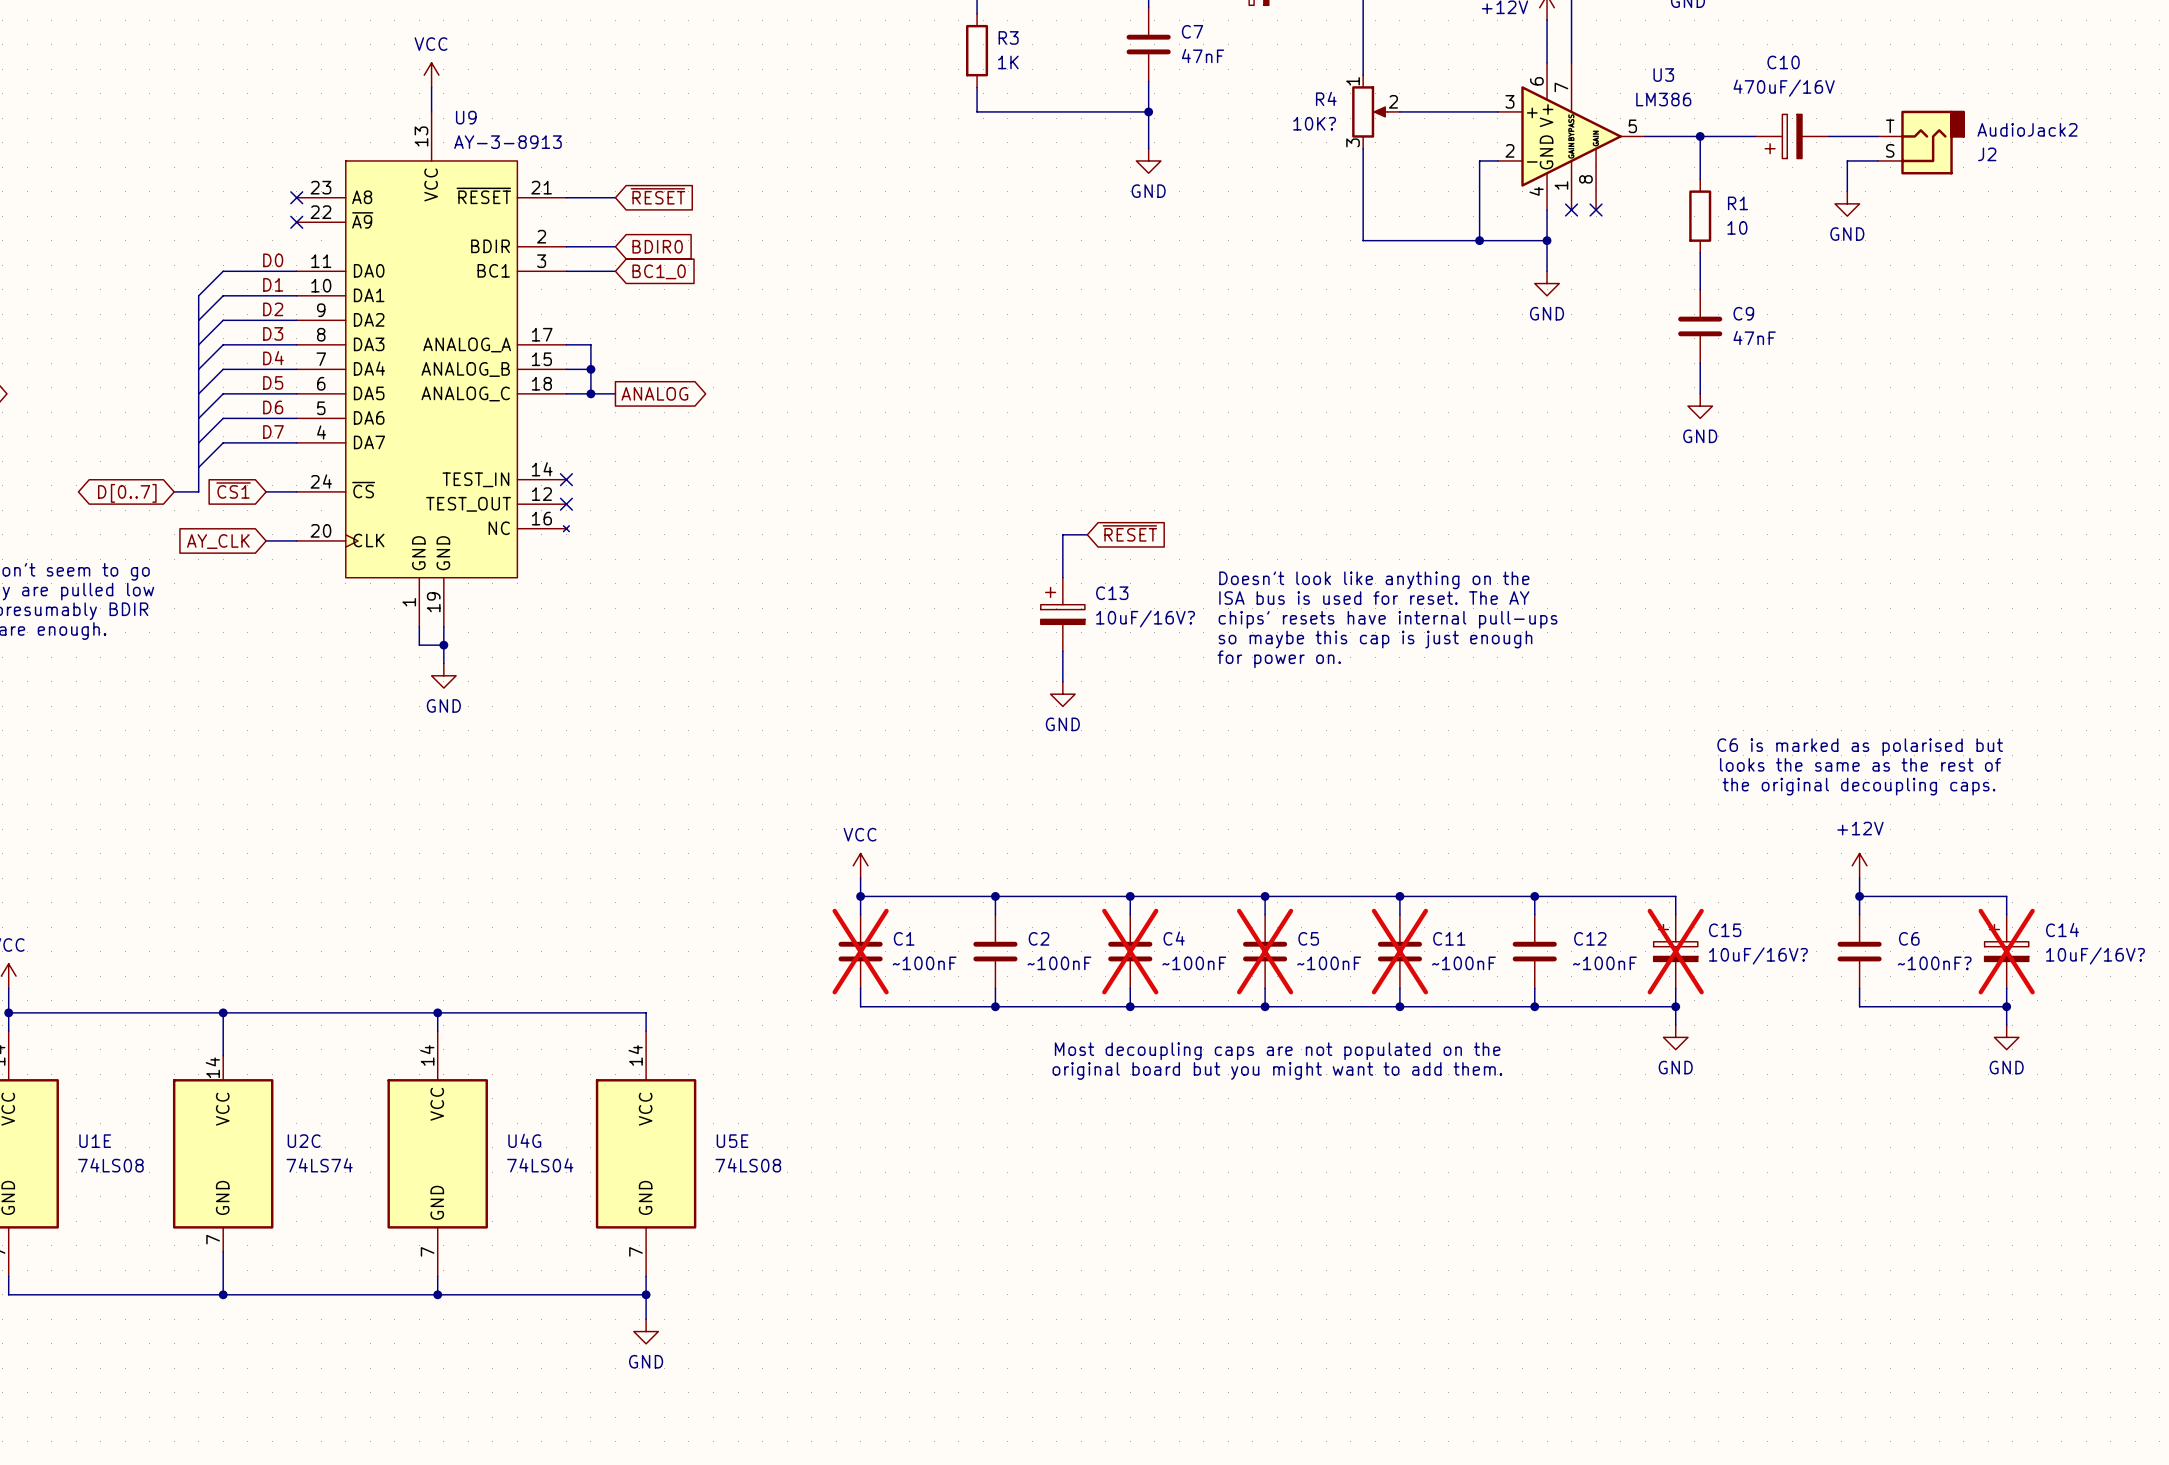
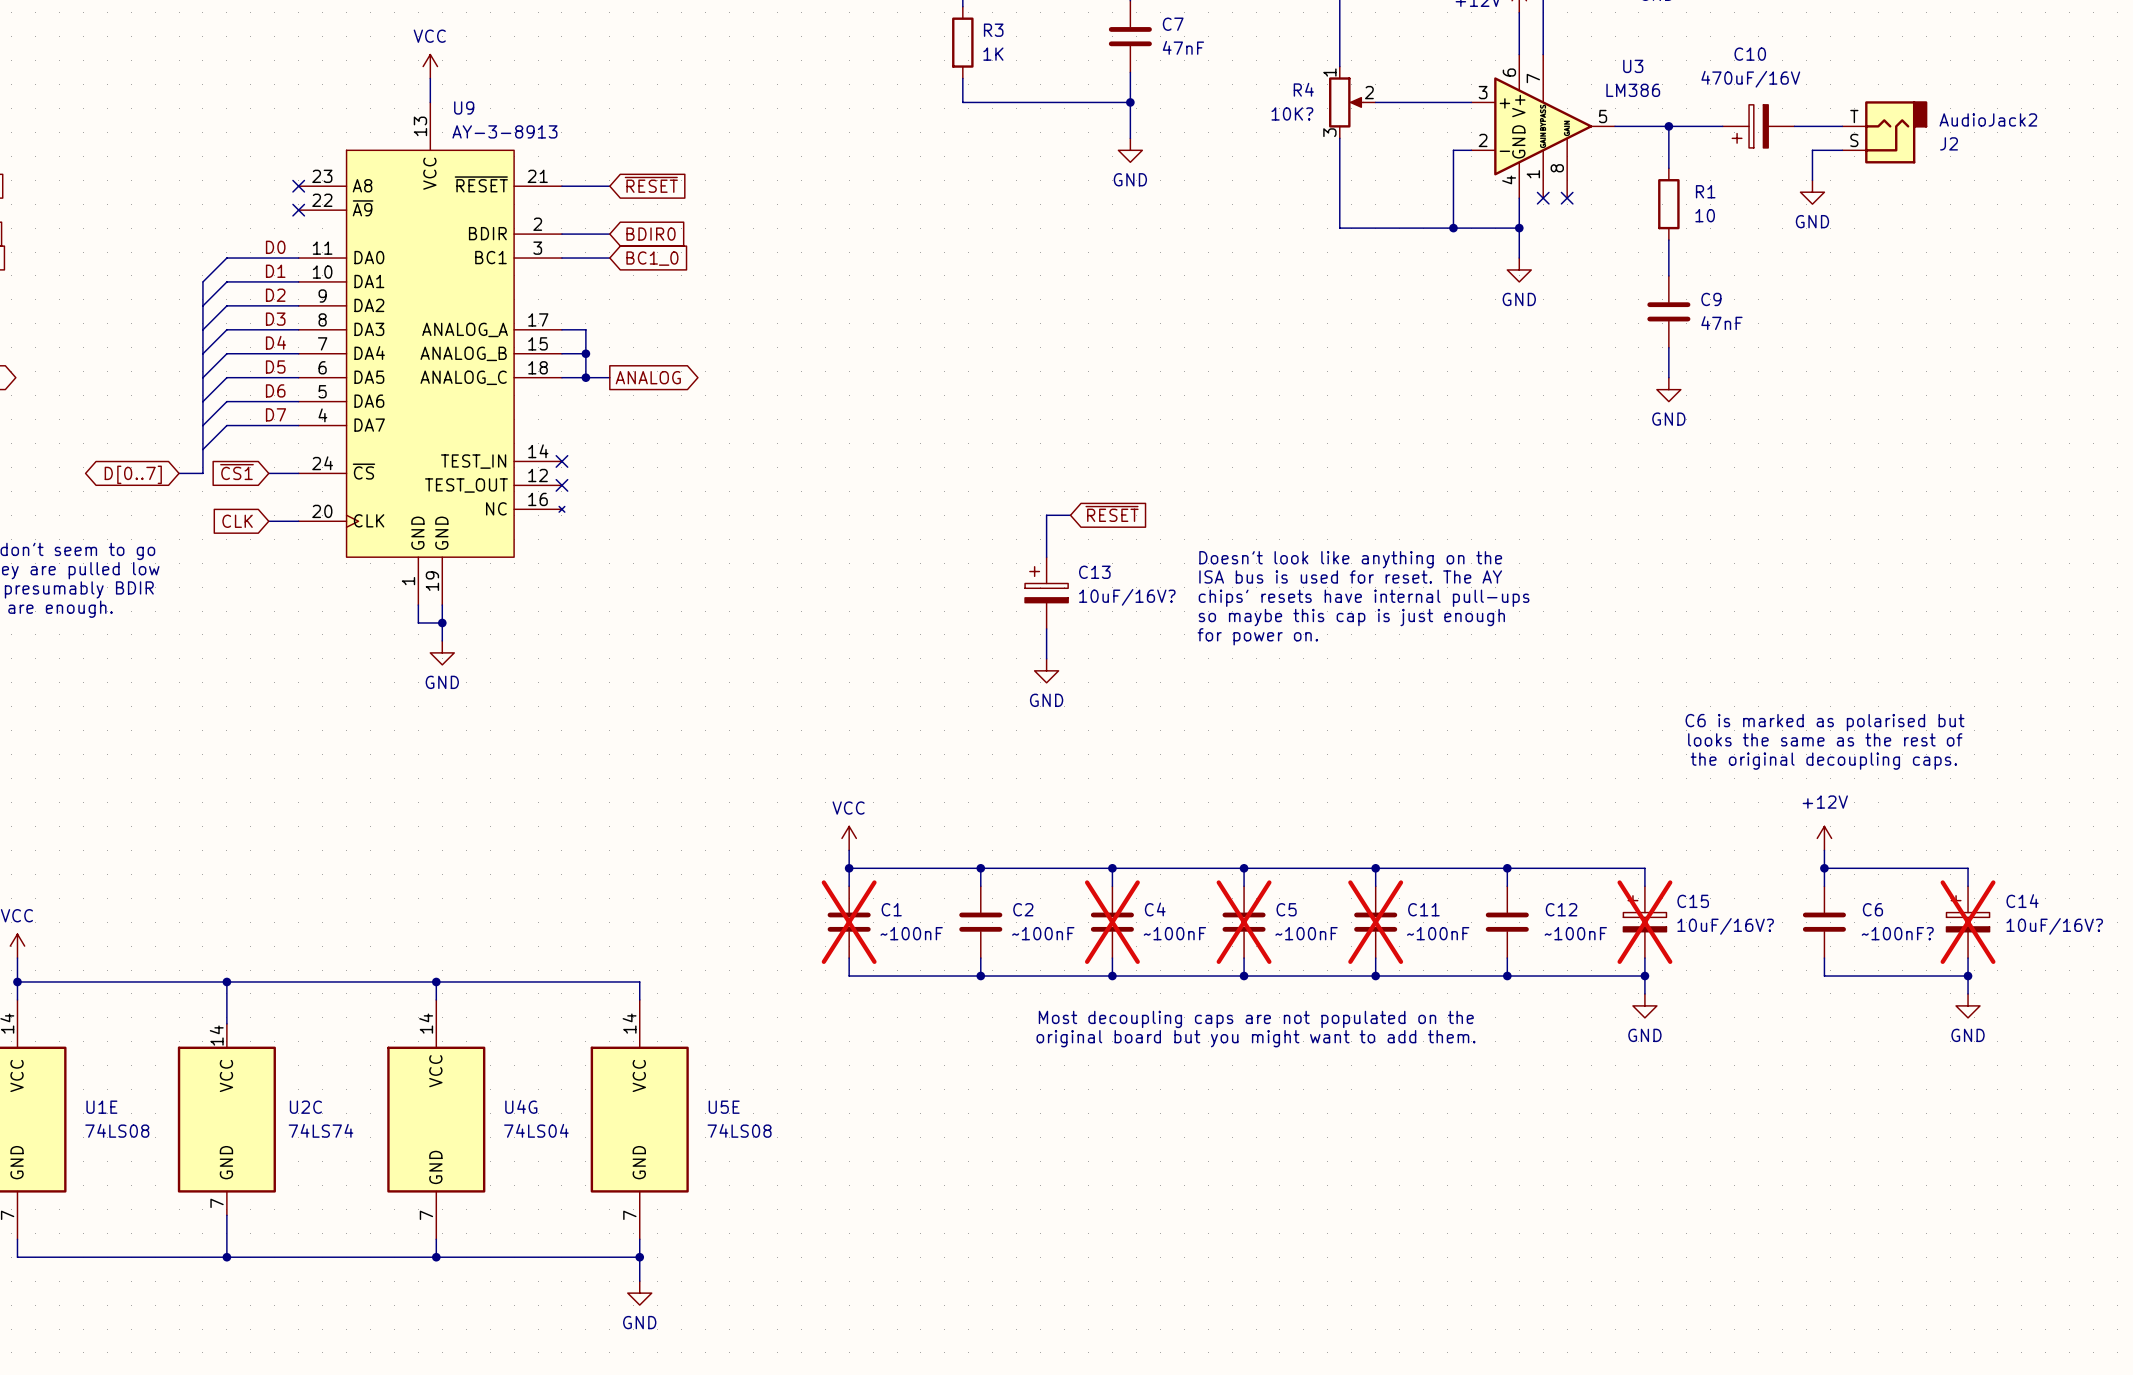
global label: AY_CLK (218, 541) -> CLK (237, 521)

